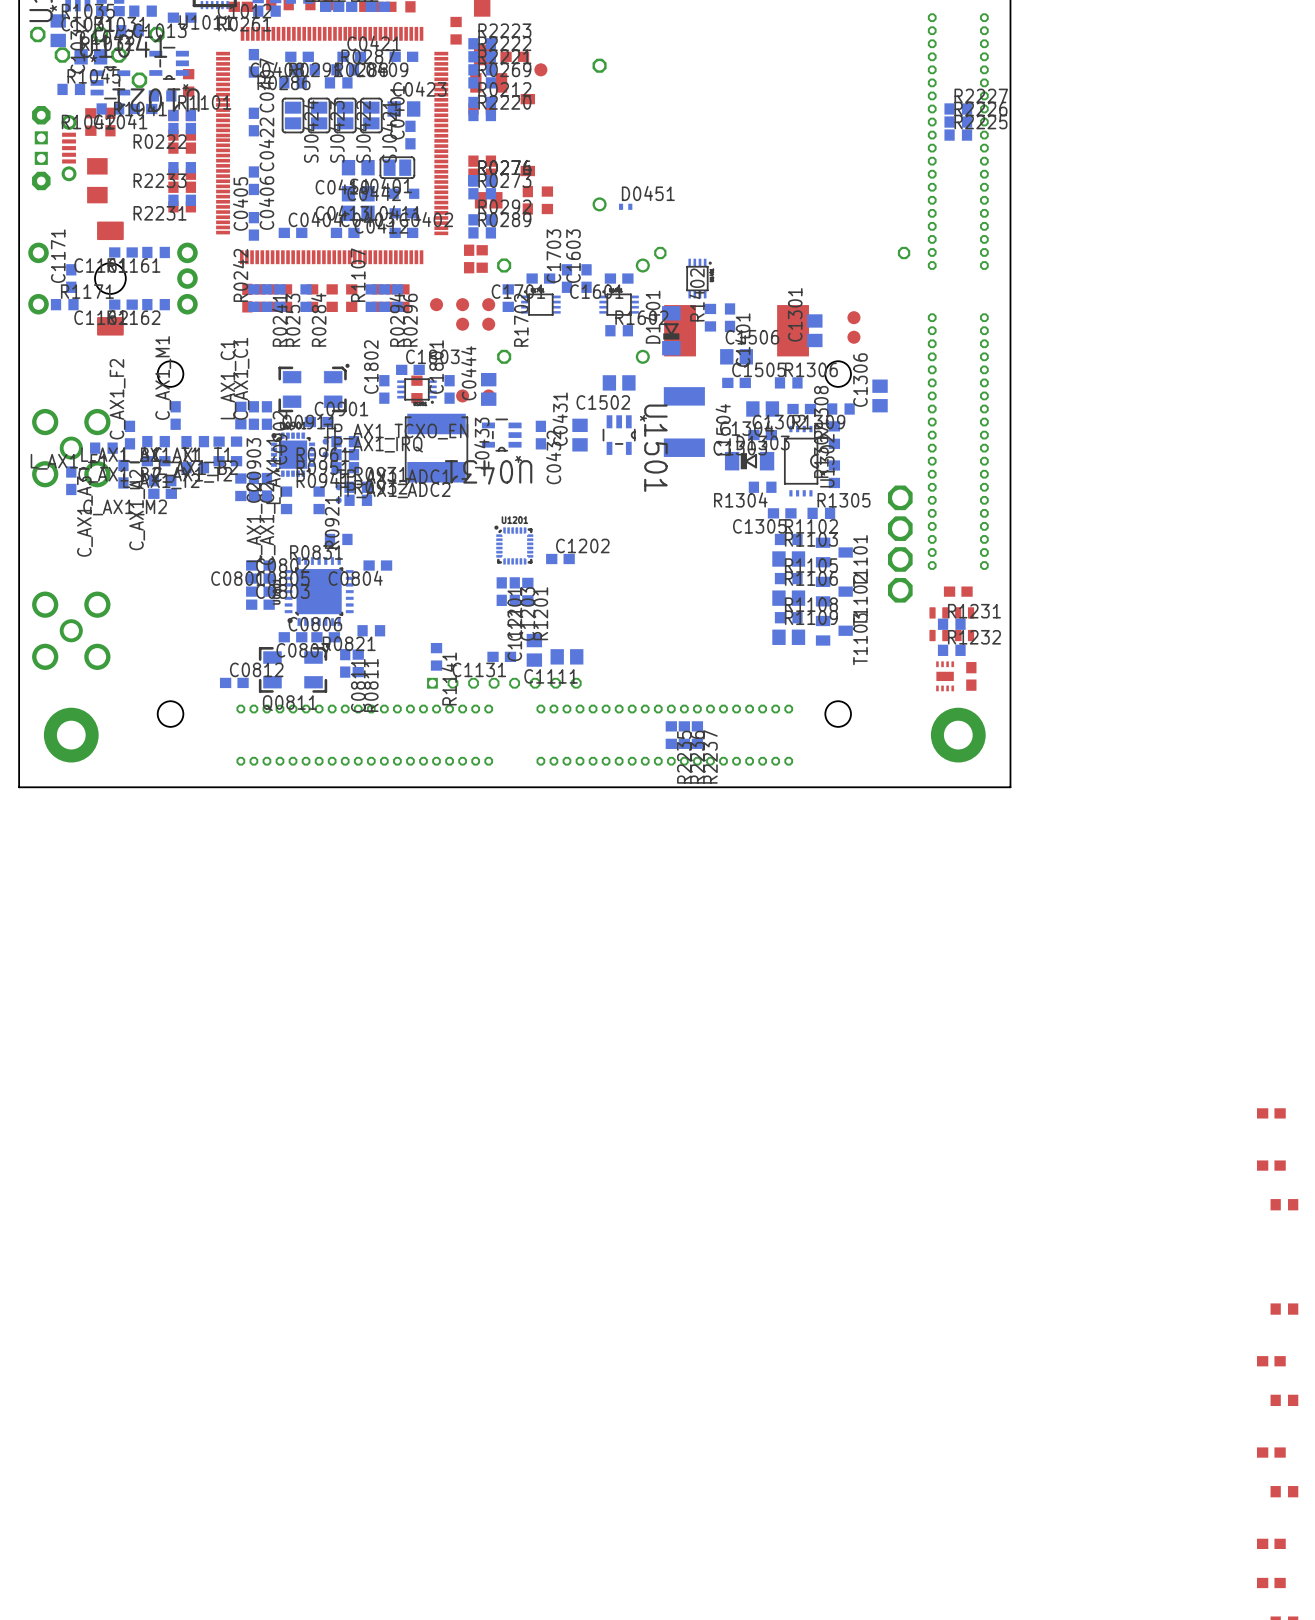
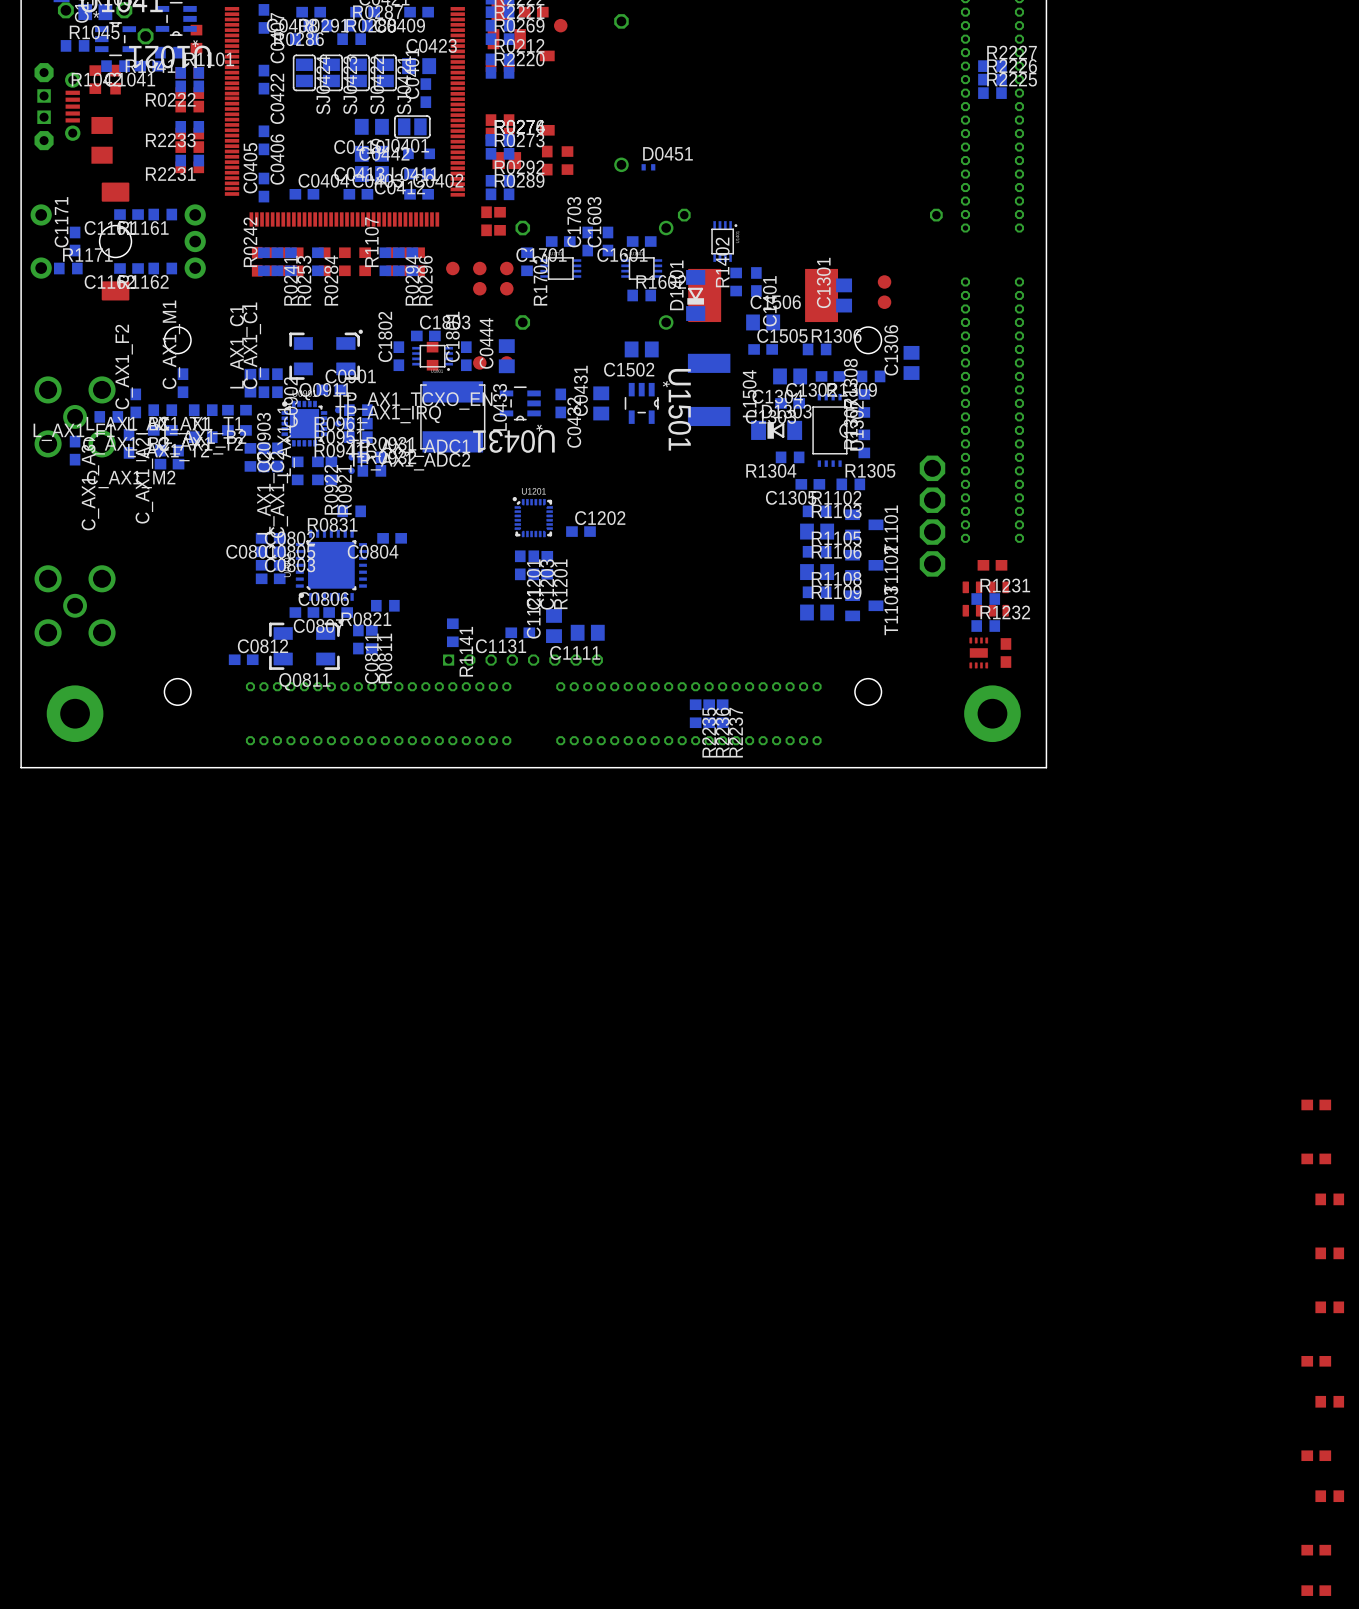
R0922: none -> (317, 470)
part: none -> (1329, 1253)

